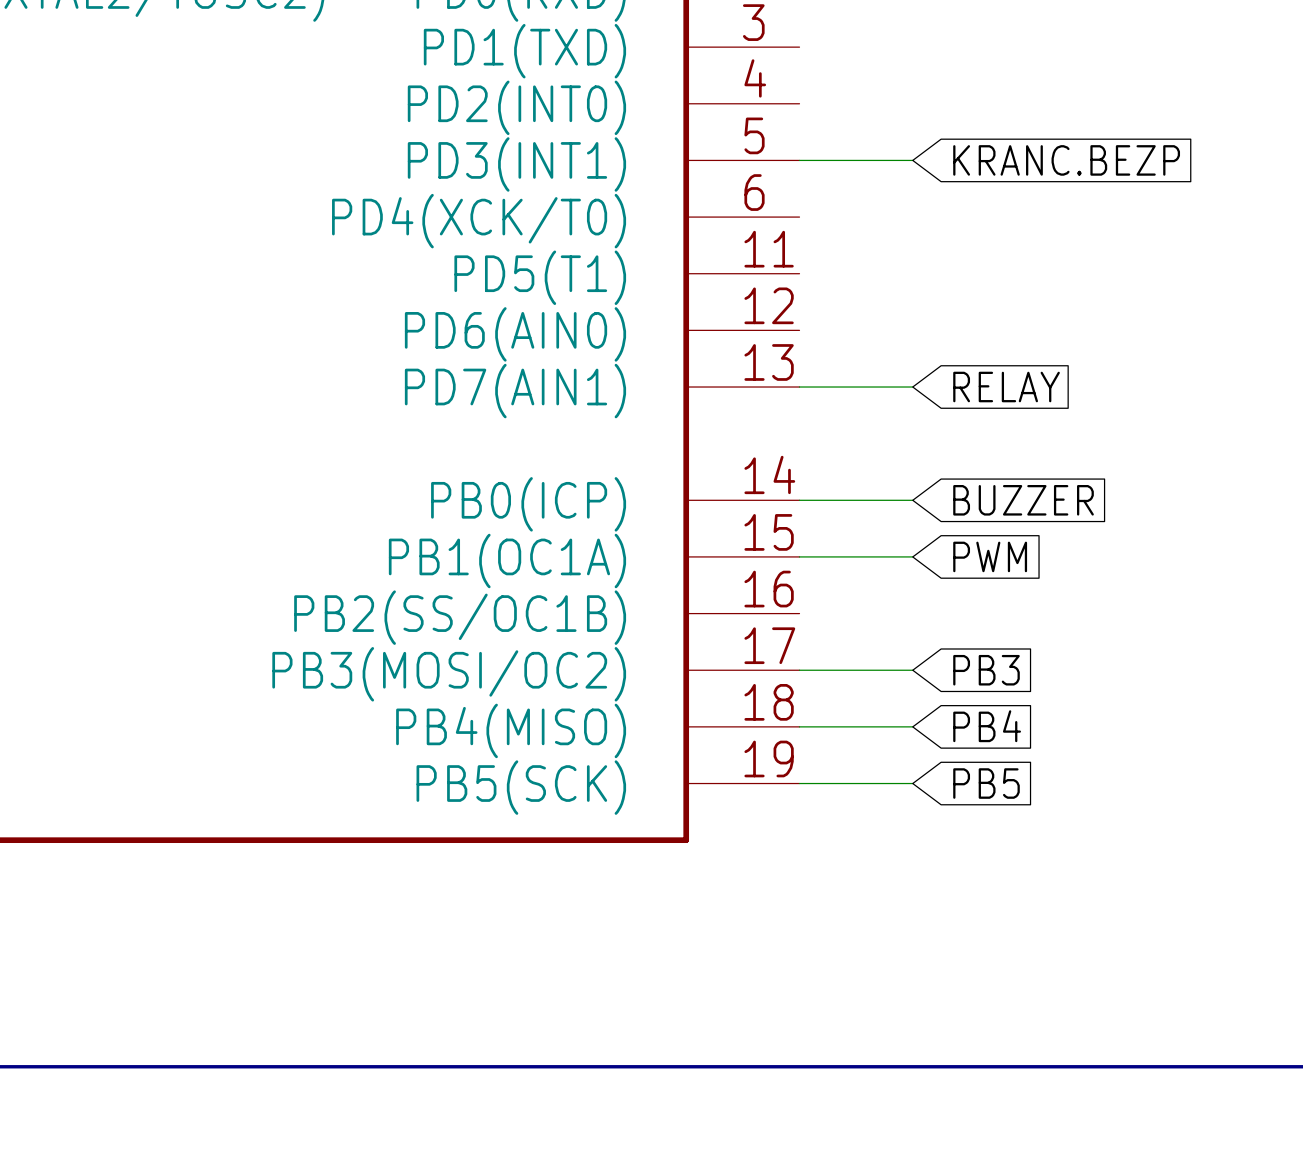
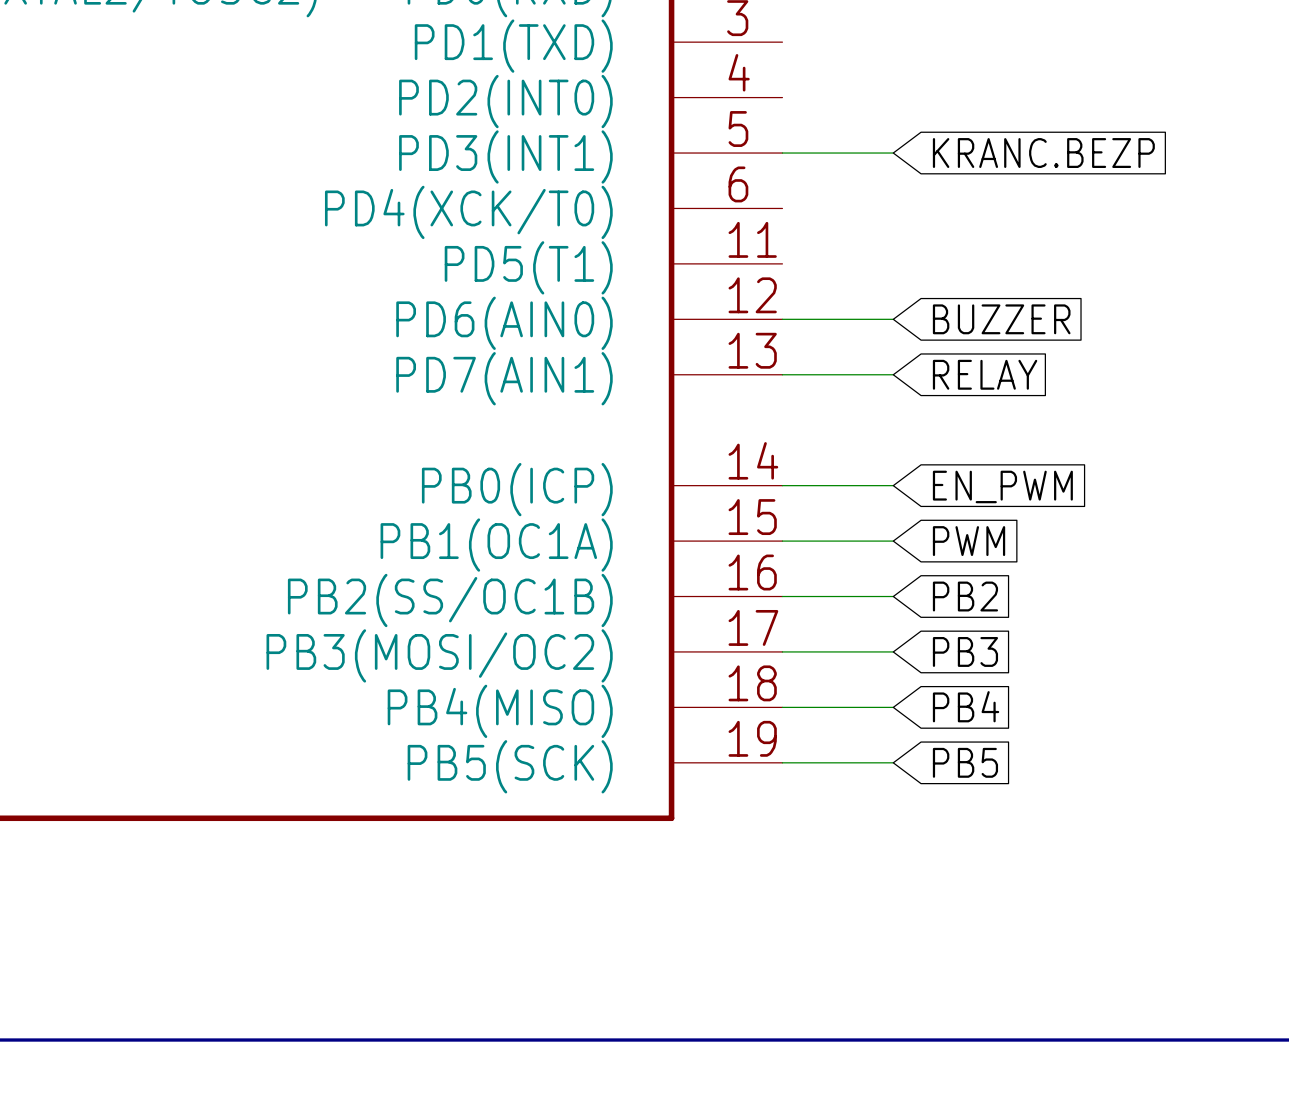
wire: none -> (782, 319) (893, 319)
global label: none -> BUZZER (1001, 319)
global label: BUZZER (1023, 500) -> EN_PWM (1002, 486)
wire: none -> (782, 596) (893, 596)
global label: none -> PB2 (965, 596)

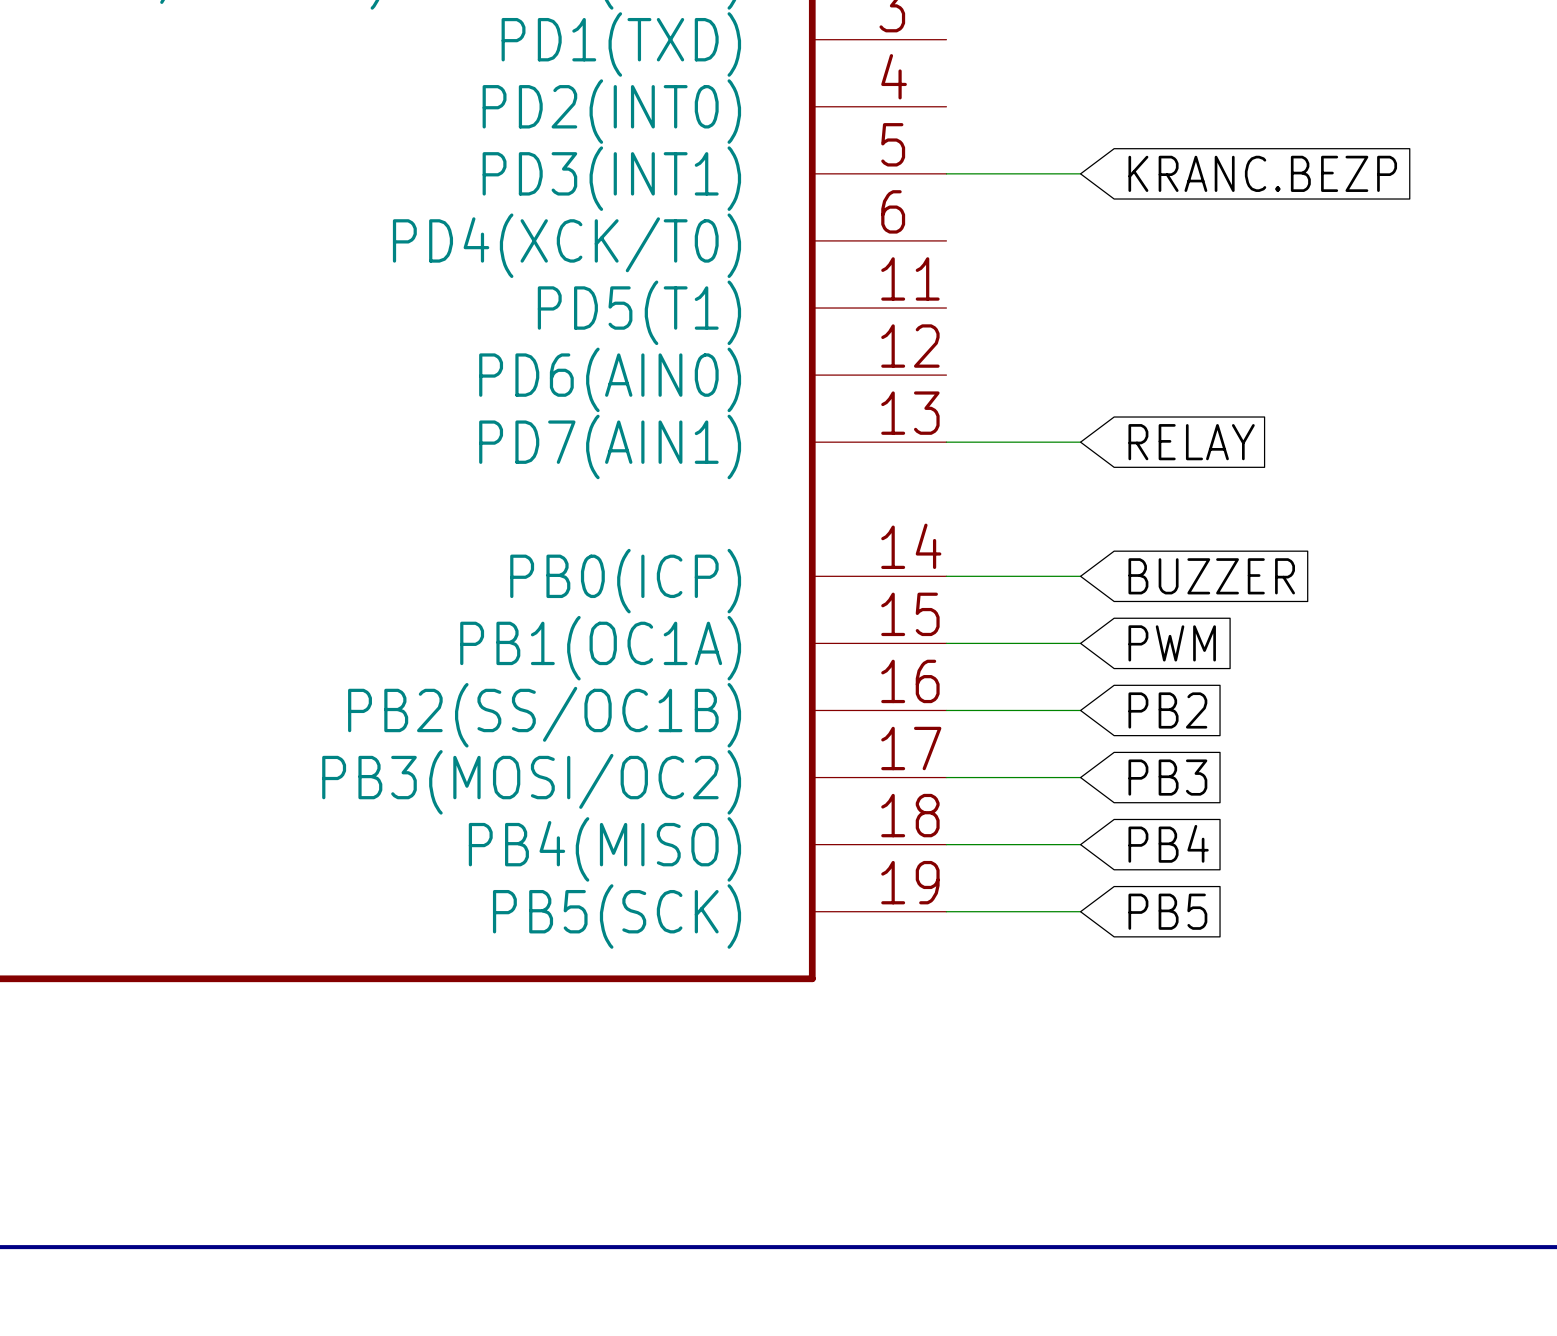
wire: (782, 319) (893, 319) -> none
global label: BUZZER (1001, 319) -> none
global label: EN_PWM (1002, 486) -> BUZZER (1211, 576)

